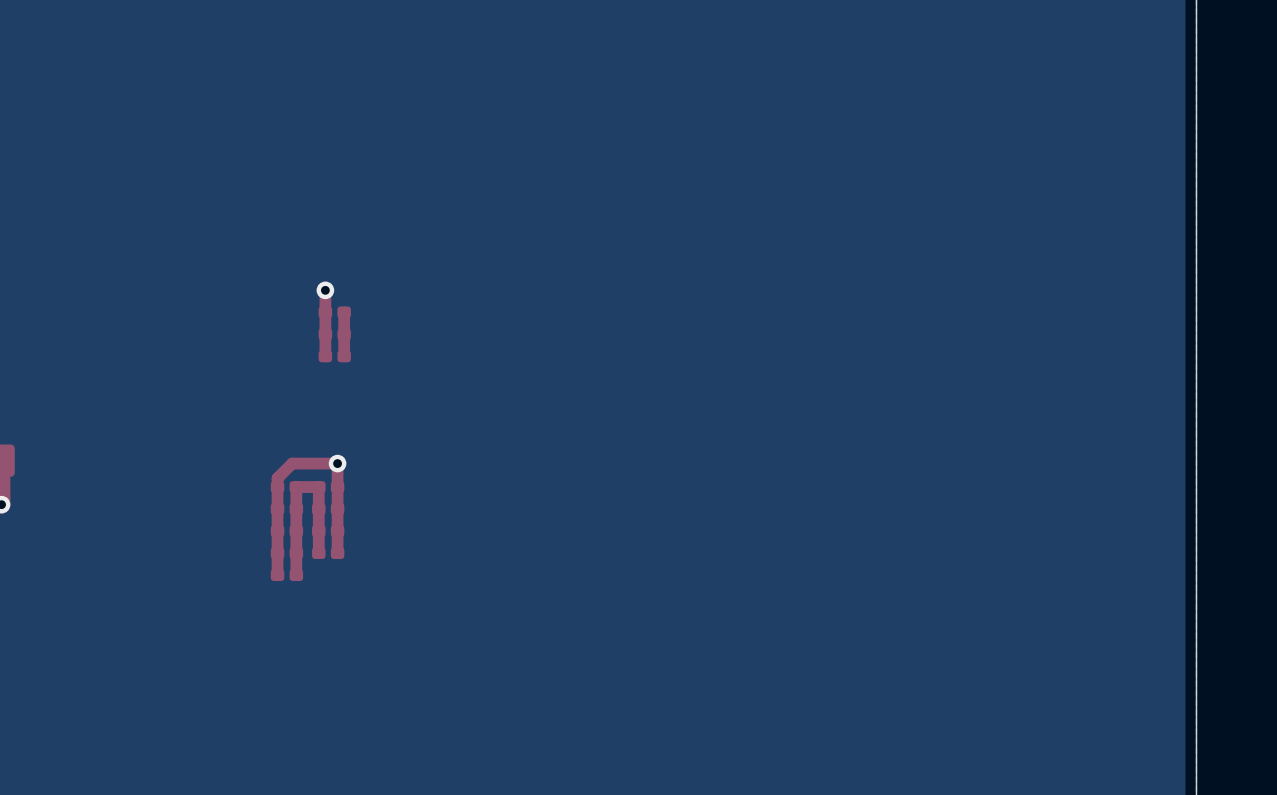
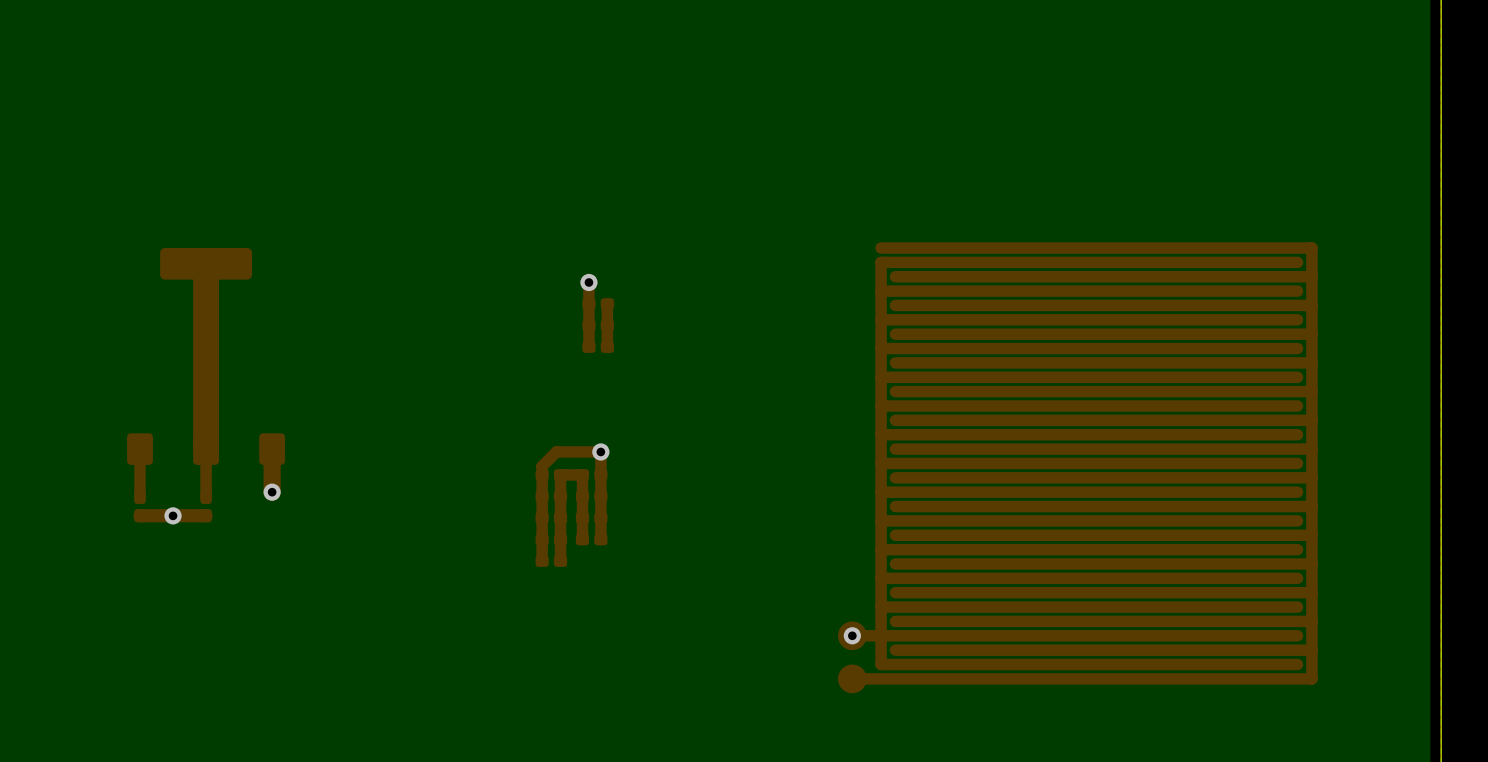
part: none -> (1077, 467)
via: none -> (852, 635)

